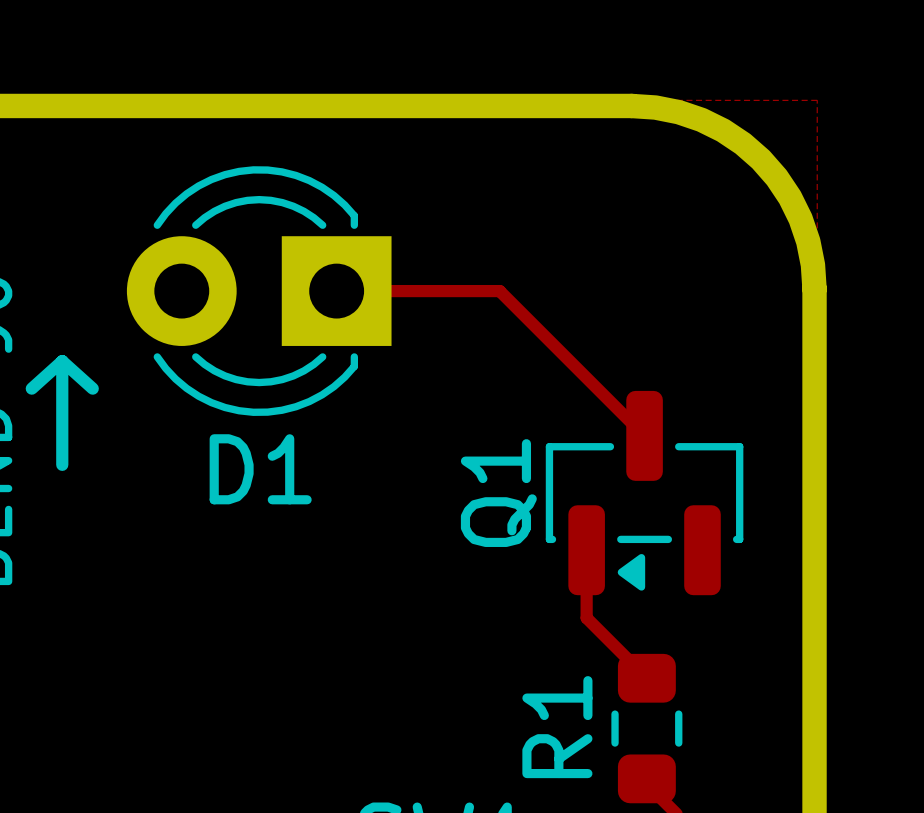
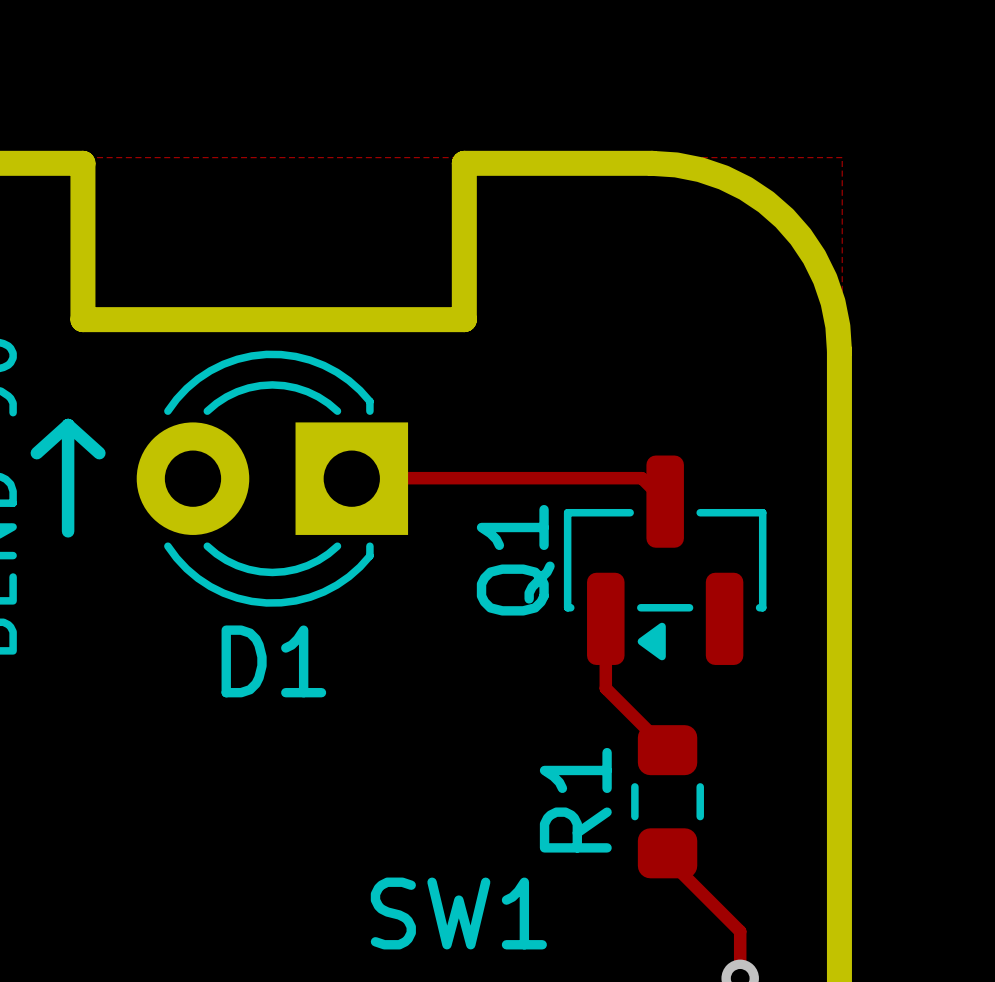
board edge: (76, 105) (448, 105) -> (82, 163) (82, 319) (464, 319) (464, 163)
D1 position: (259, 291) -> (272, 478)
track: (336, 291) (499, 291) (621, 413) -> (352, 478) (641, 478)

